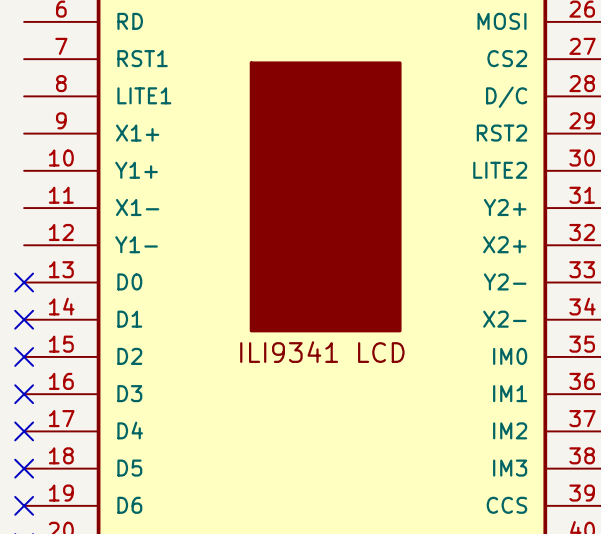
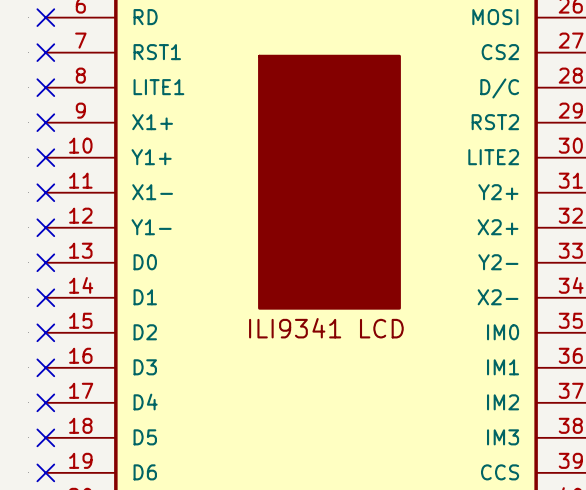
no-connect mark: none -> (45, 17)
no-connect mark: none -> (45, 52)
no-connect mark: none -> (45, 87)
no-connect mark: none -> (45, 122)
no-connect mark: none -> (45, 157)
no-connect mark: none -> (45, 192)
no-connect mark: none -> (45, 227)

